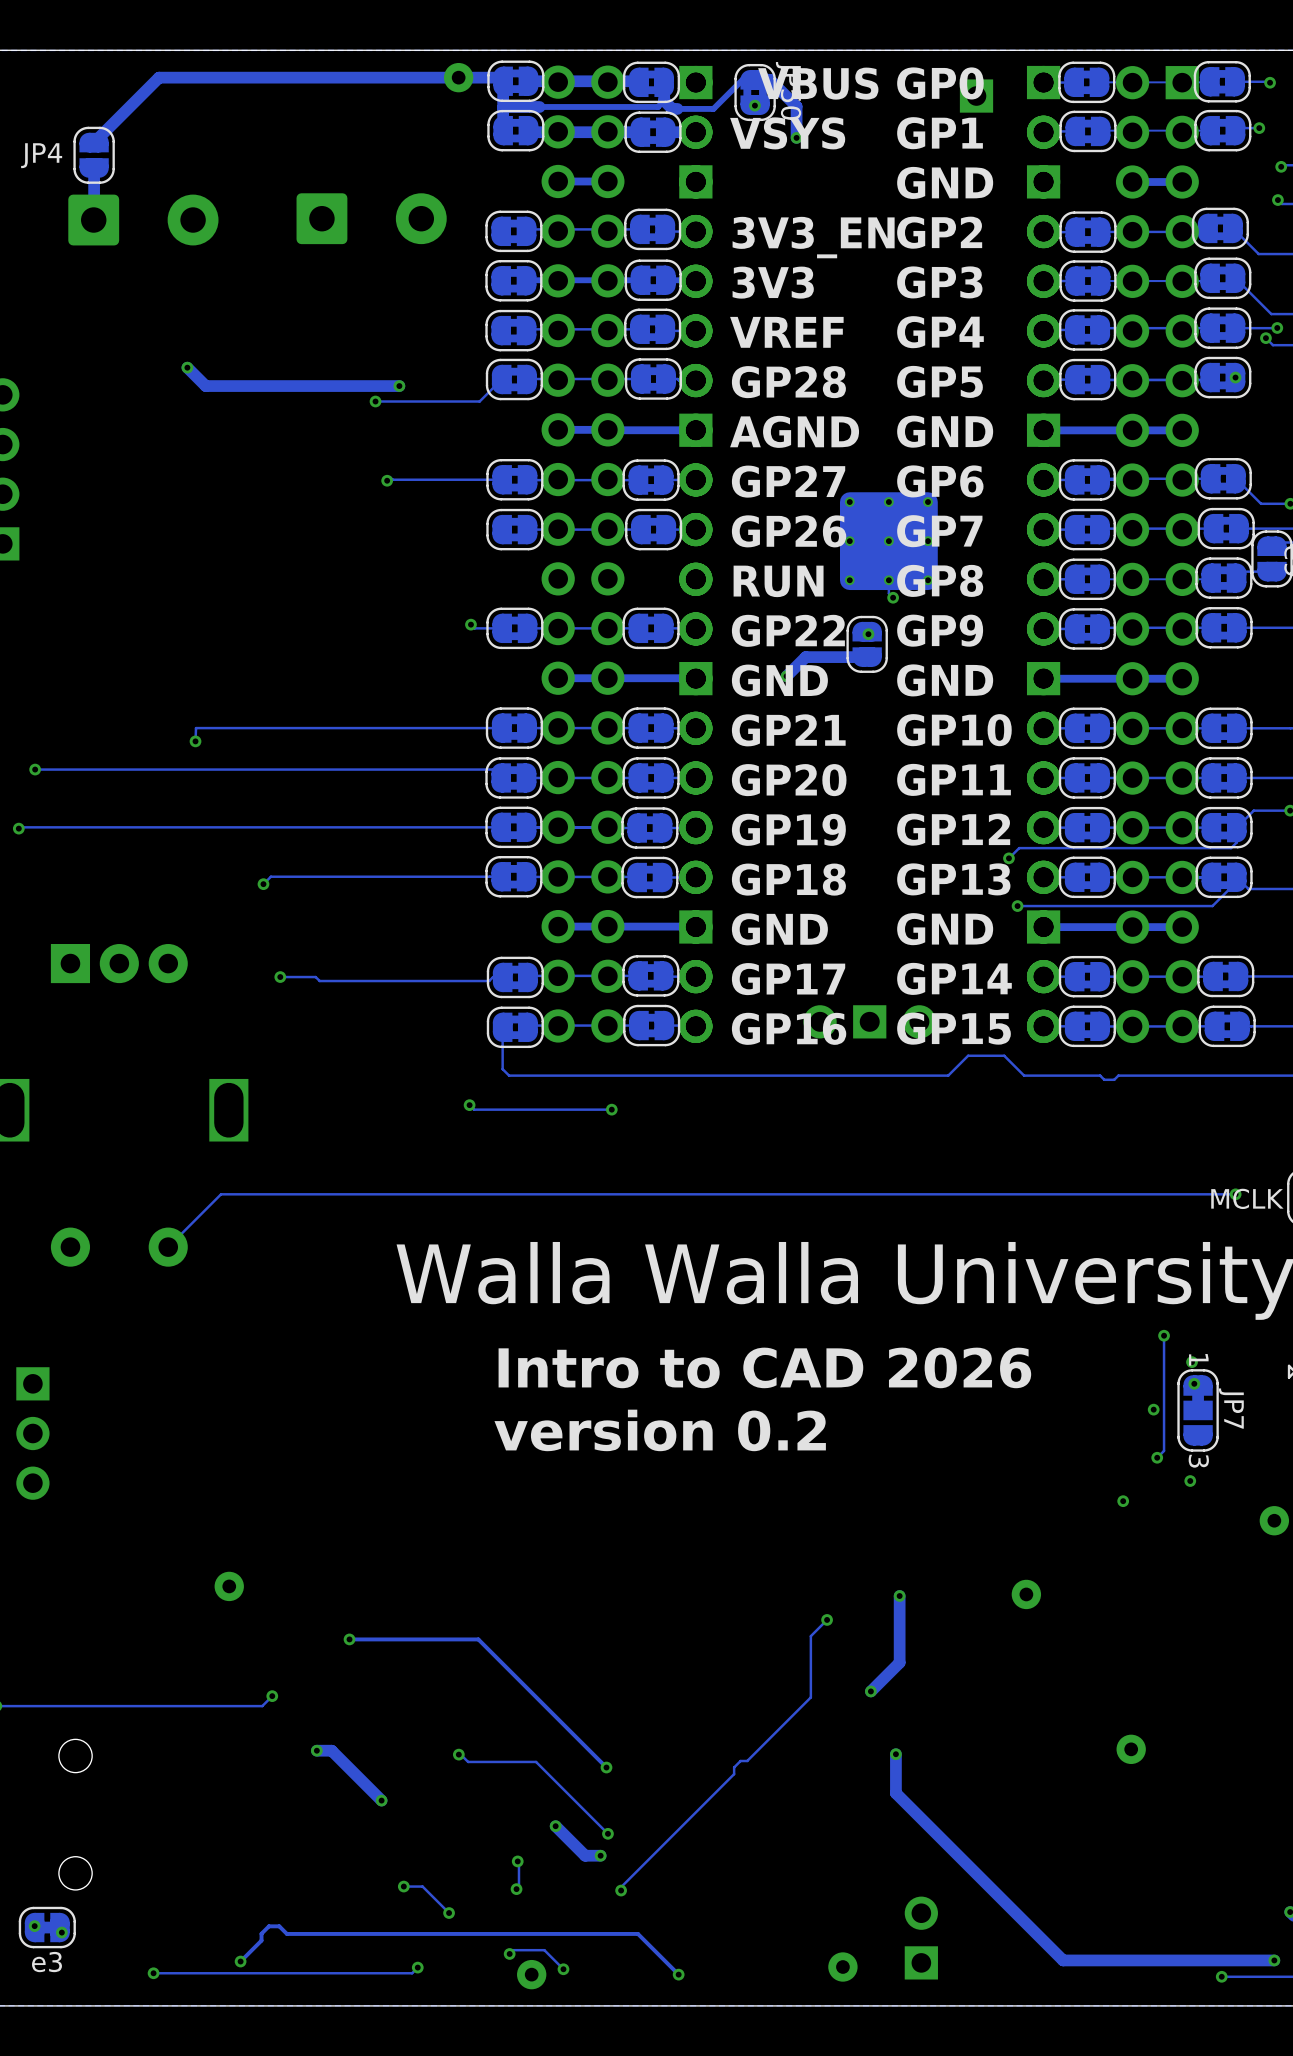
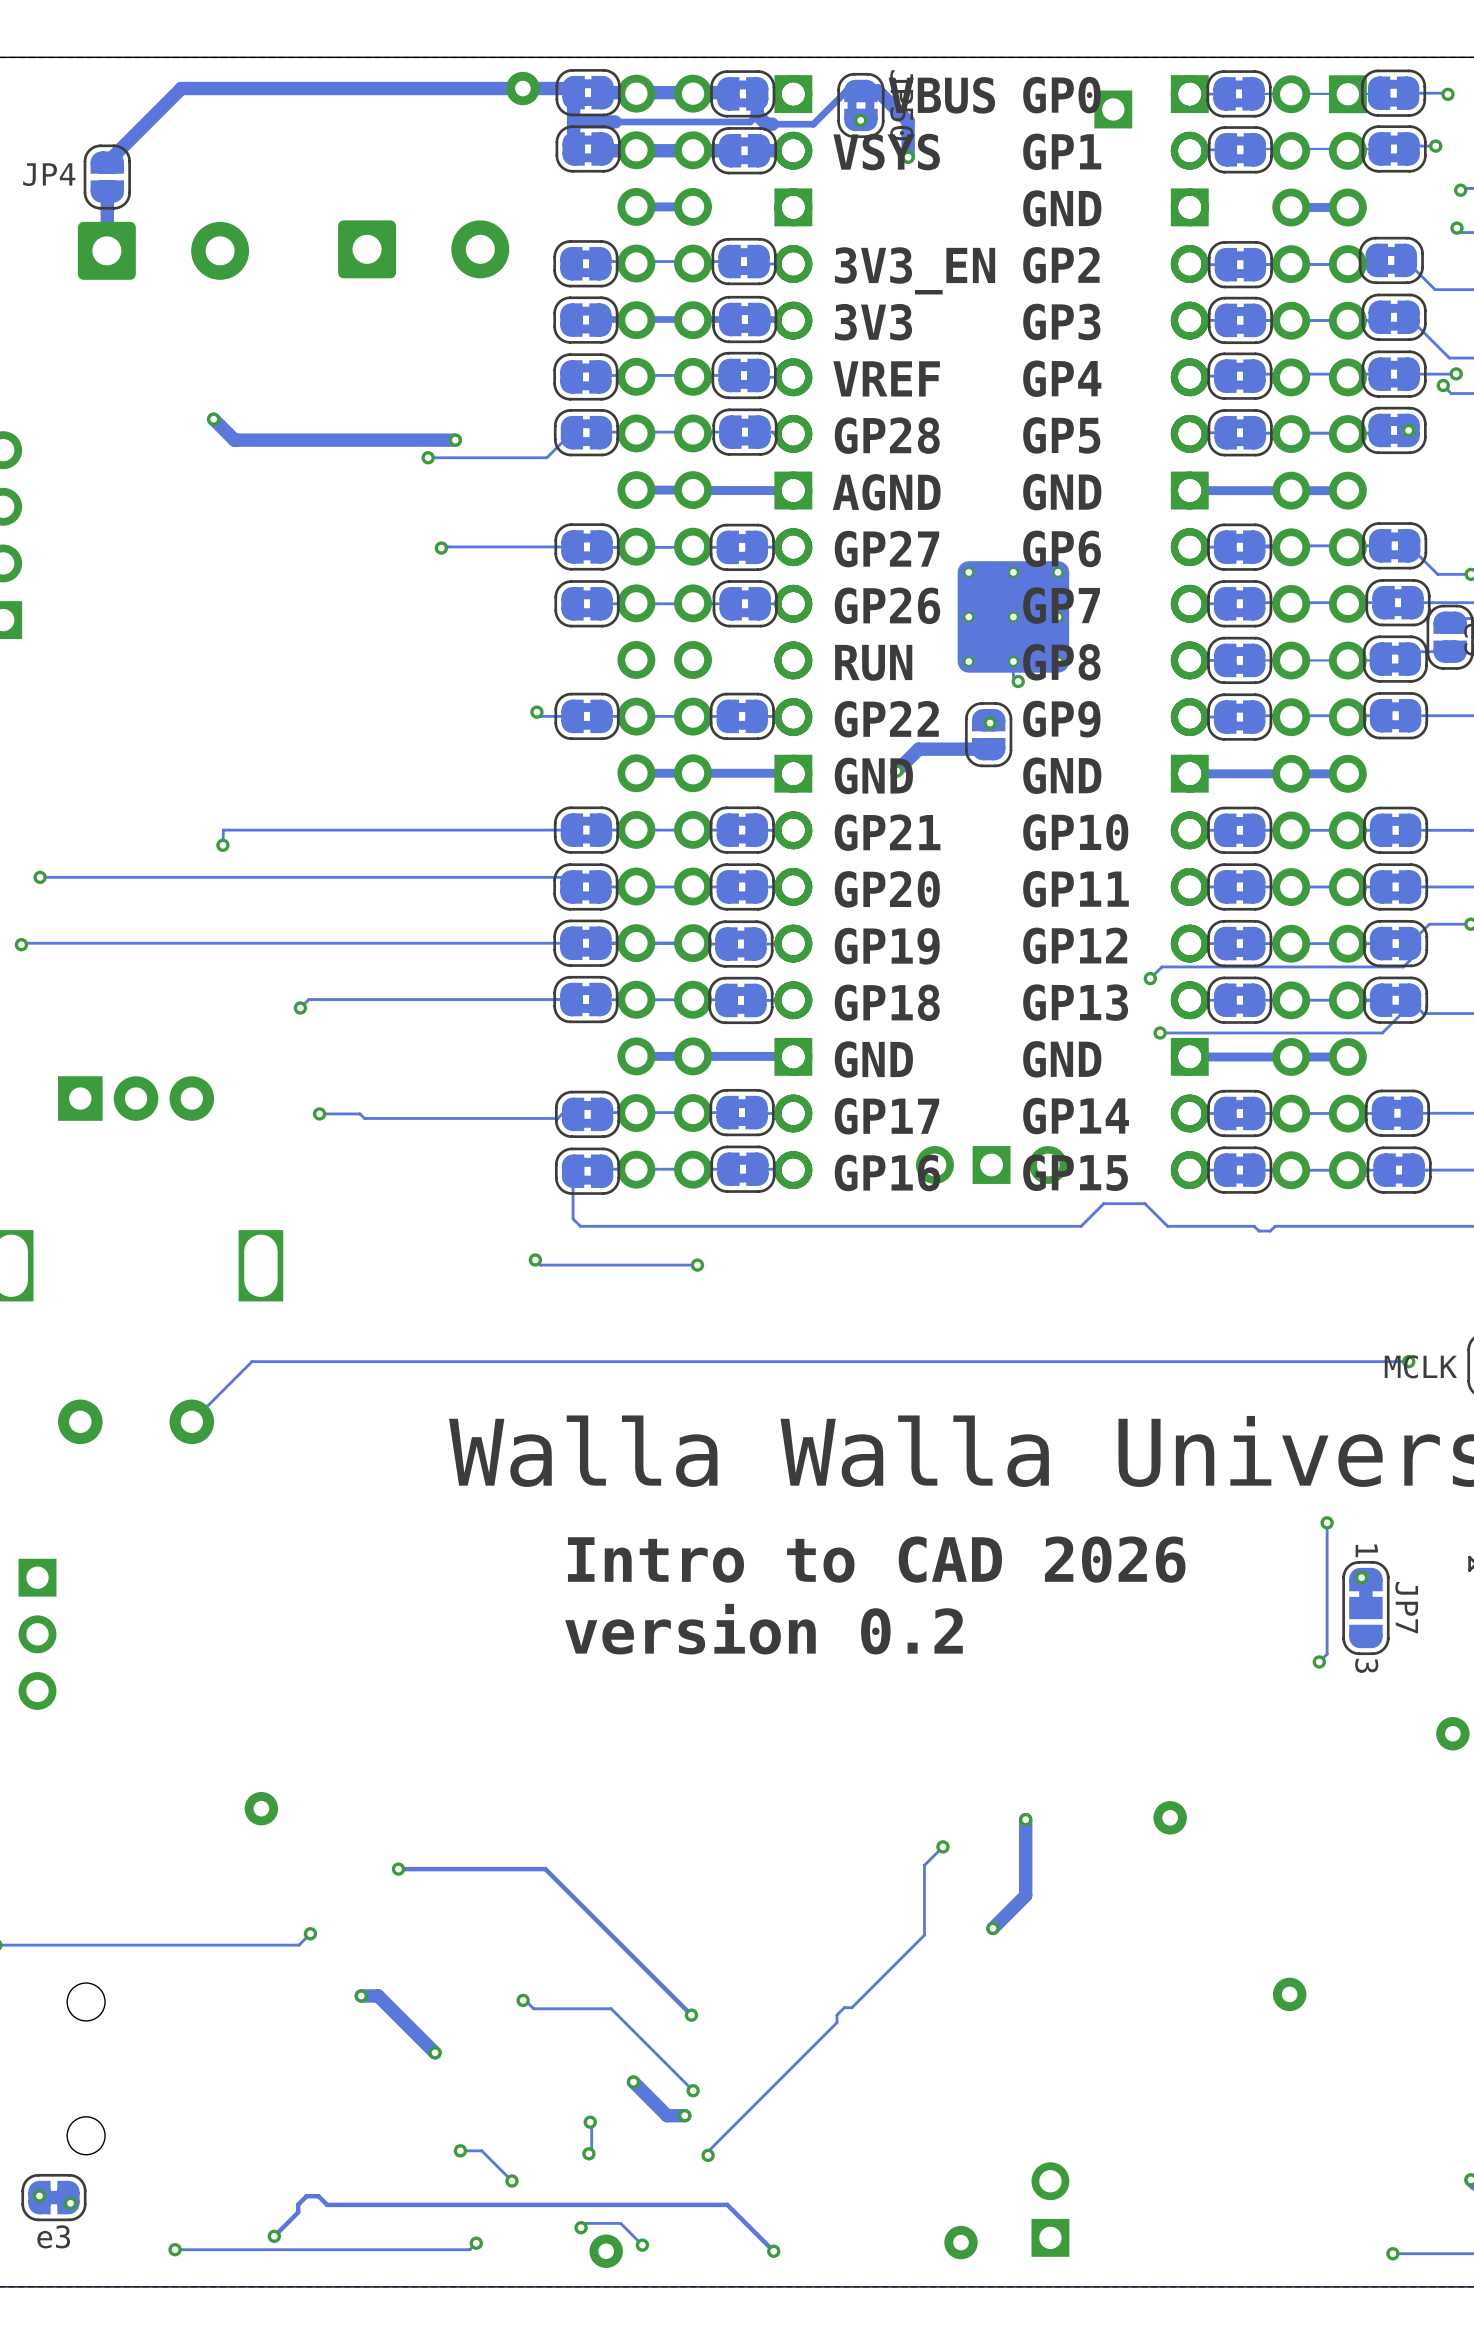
via: (1192, 1362) -> none
via: (1153, 1409) -> none
via: (1190, 1481) -> none
via: (1123, 1501) -> none
track: (895, 1754) (895, 1793) (1063, 1960) (1274, 1960) -> none
via: (895, 1754) -> none
via: (1274, 1960) -> none

